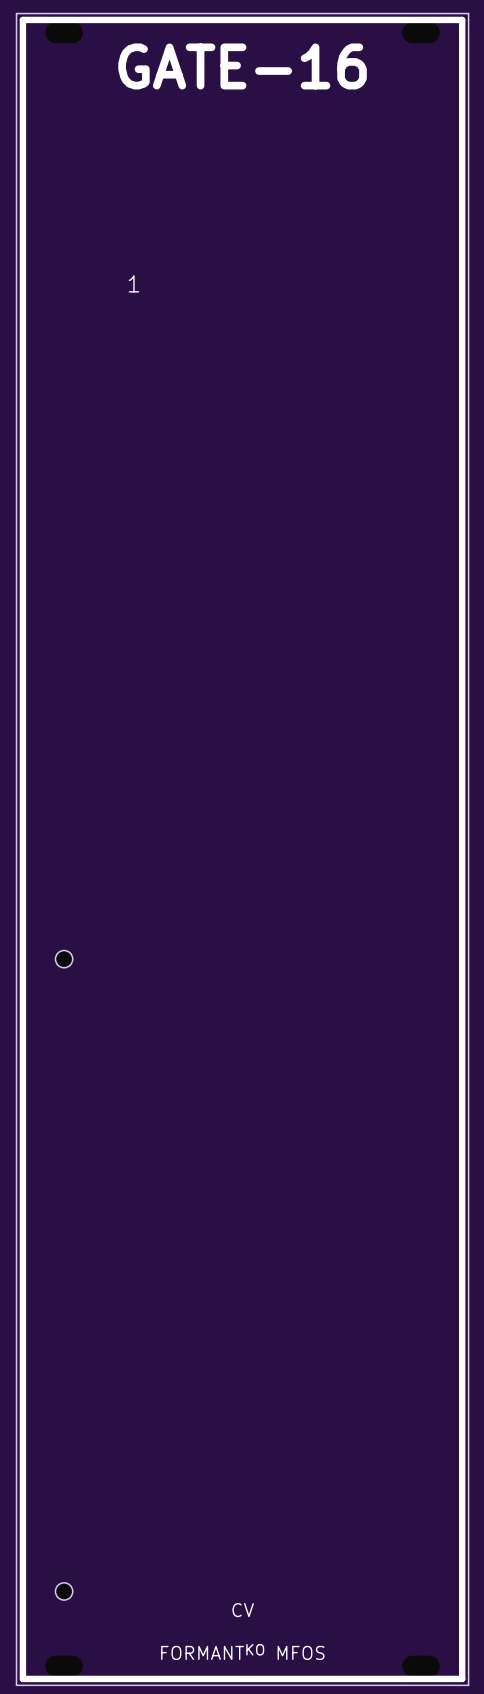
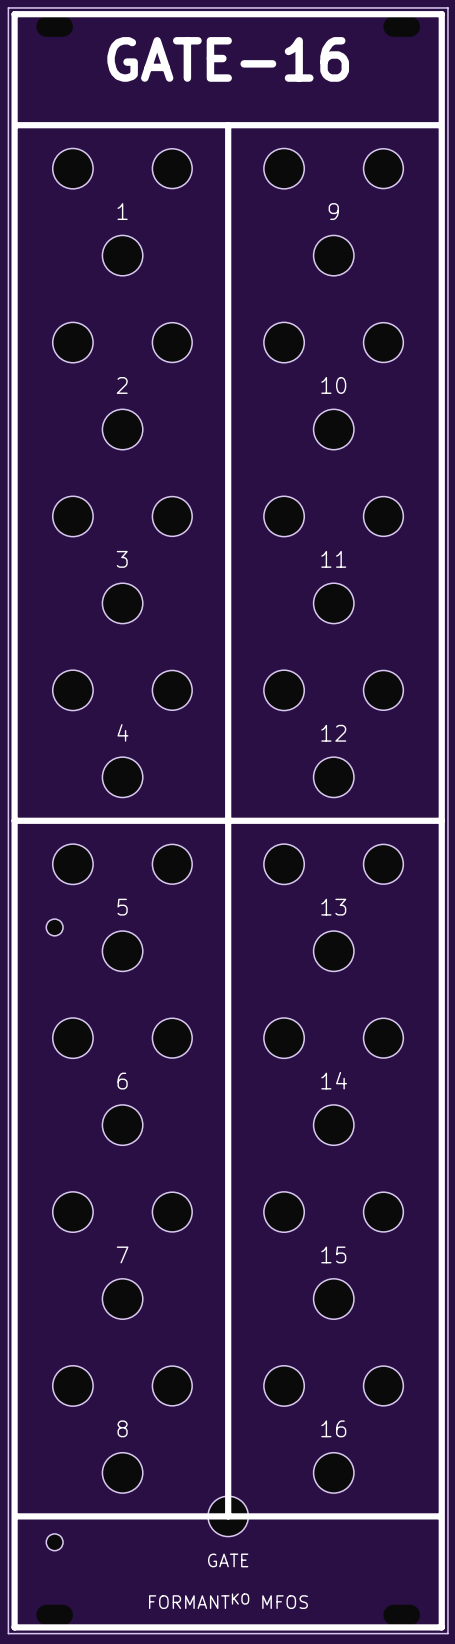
line: none -> (17, 125) (439, 125)
line: none -> (228, 125) (228, 1516)
part: none -> (72, 168)
part: none -> (172, 168)
part: none -> (284, 168)
part: none -> (383, 168)
text: none -> 9 (333, 211)
part: none -> (122, 255)
part: none -> (333, 255)
text position: 1 (133, 283) -> 1 (122, 211)
part: none -> (72, 342)
part: none -> (172, 342)
part: none -> (284, 342)
part: none -> (383, 342)
text: none -> 2 (122, 385)
text: none -> 10 (333, 385)
part: none -> (122, 429)
part: none -> (333, 429)
part: none -> (72, 516)
part: none -> (172, 516)
part: none -> (284, 516)
part: none -> (383, 516)
text: none -> 3 (122, 559)
text: none -> 11 (333, 559)
part: none -> (122, 603)
part: none -> (333, 603)
part: none -> (72, 690)
part: none -> (172, 690)
part: none -> (284, 690)
part: none -> (383, 690)
text: none -> 4 (122, 732)
text: none -> 12 (333, 733)
part: none -> (122, 777)
part: none -> (333, 777)
line: none -> (14, 820) (441, 820)
part: none -> (72, 864)
part: none -> (172, 864)
part: none -> (284, 864)
part: none -> (383, 864)
text: none -> 5 (122, 907)
text: none -> 13 (333, 907)
part: none -> (122, 951)
part: none -> (333, 951)
part: none -> (72, 1038)
part: none -> (172, 1038)
part: none -> (284, 1038)
part: none -> (383, 1038)
text: none -> 14 (334, 1080)
text: none -> 6 (122, 1081)
part: none -> (122, 1125)
part: none -> (333, 1125)
part: none -> (72, 1212)
part: none -> (172, 1212)
part: none -> (284, 1212)
part: none -> (383, 1212)
text: none -> 7 (122, 1254)
text: none -> 15 (333, 1254)
part: none -> (122, 1299)
part: none -> (333, 1299)
part: none -> (72, 1385)
part: none -> (172, 1385)
part: none -> (284, 1385)
part: none -> (383, 1385)
text: none -> 8 (122, 1428)
text: none -> 16 (333, 1428)
part: none -> (122, 1472)
part: none -> (333, 1472)
line: none -> (17, 1516) (439, 1516)
part: none -> (228, 1516)
text: CV (243, 1610) -> GATE (228, 1560)

